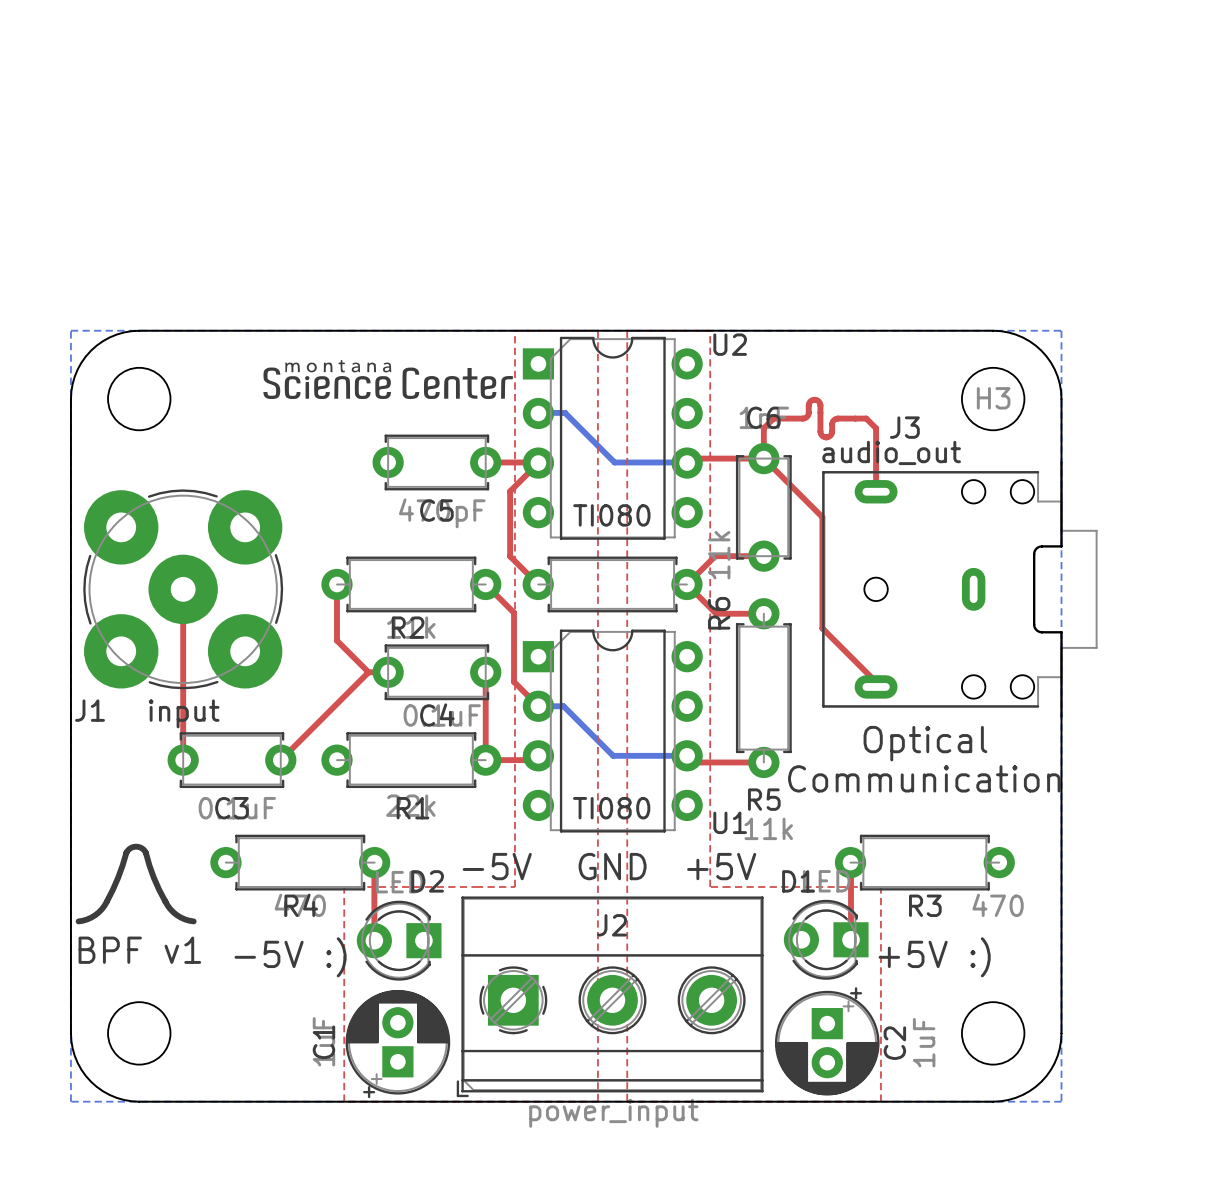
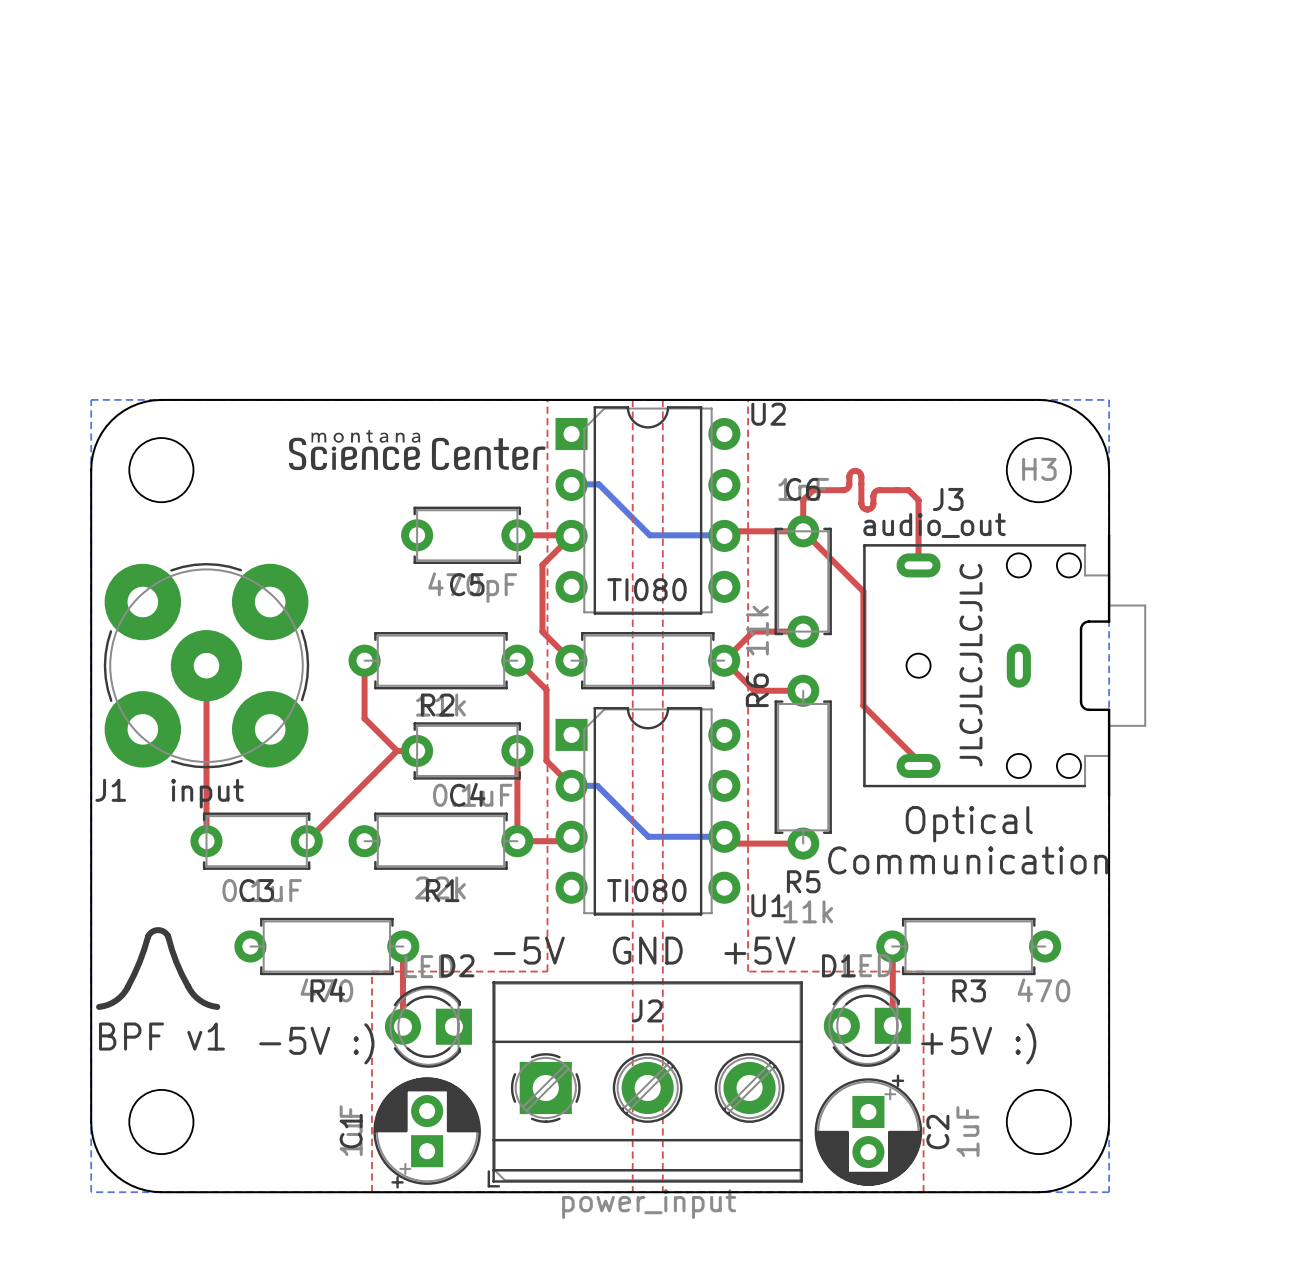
text: none -> JLCJLCJLCJLC (970, 665)

